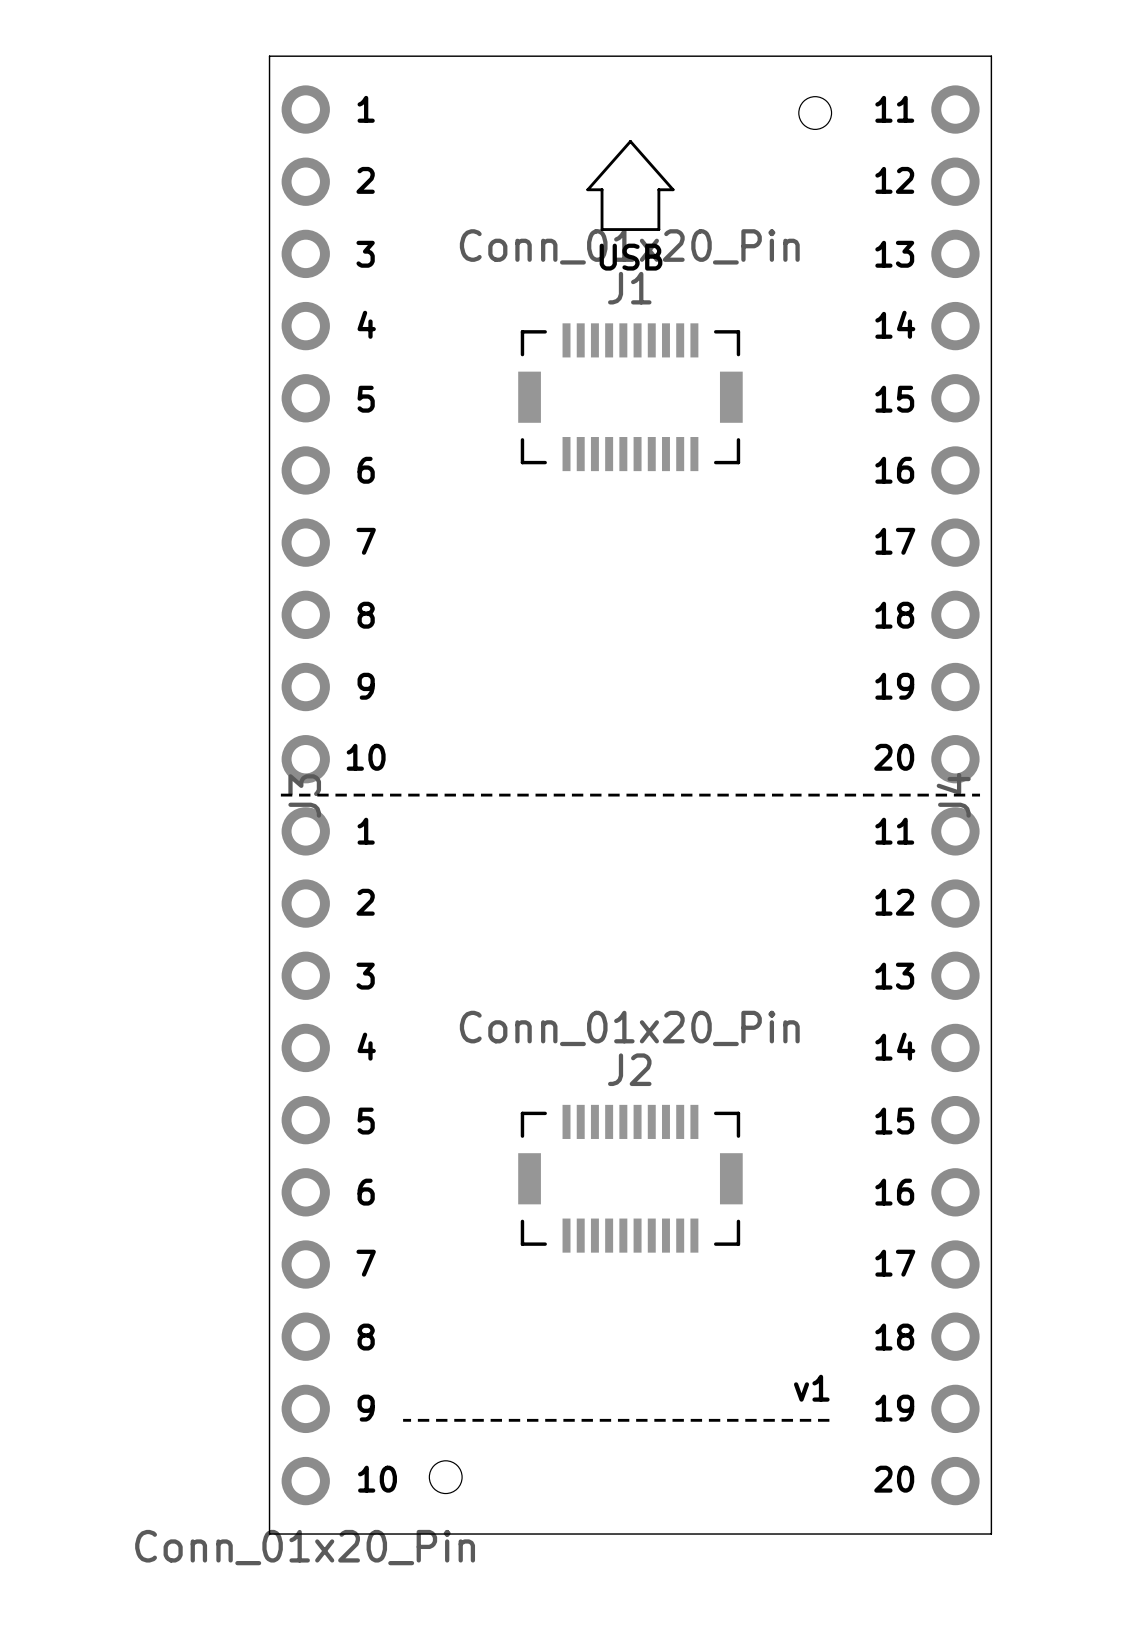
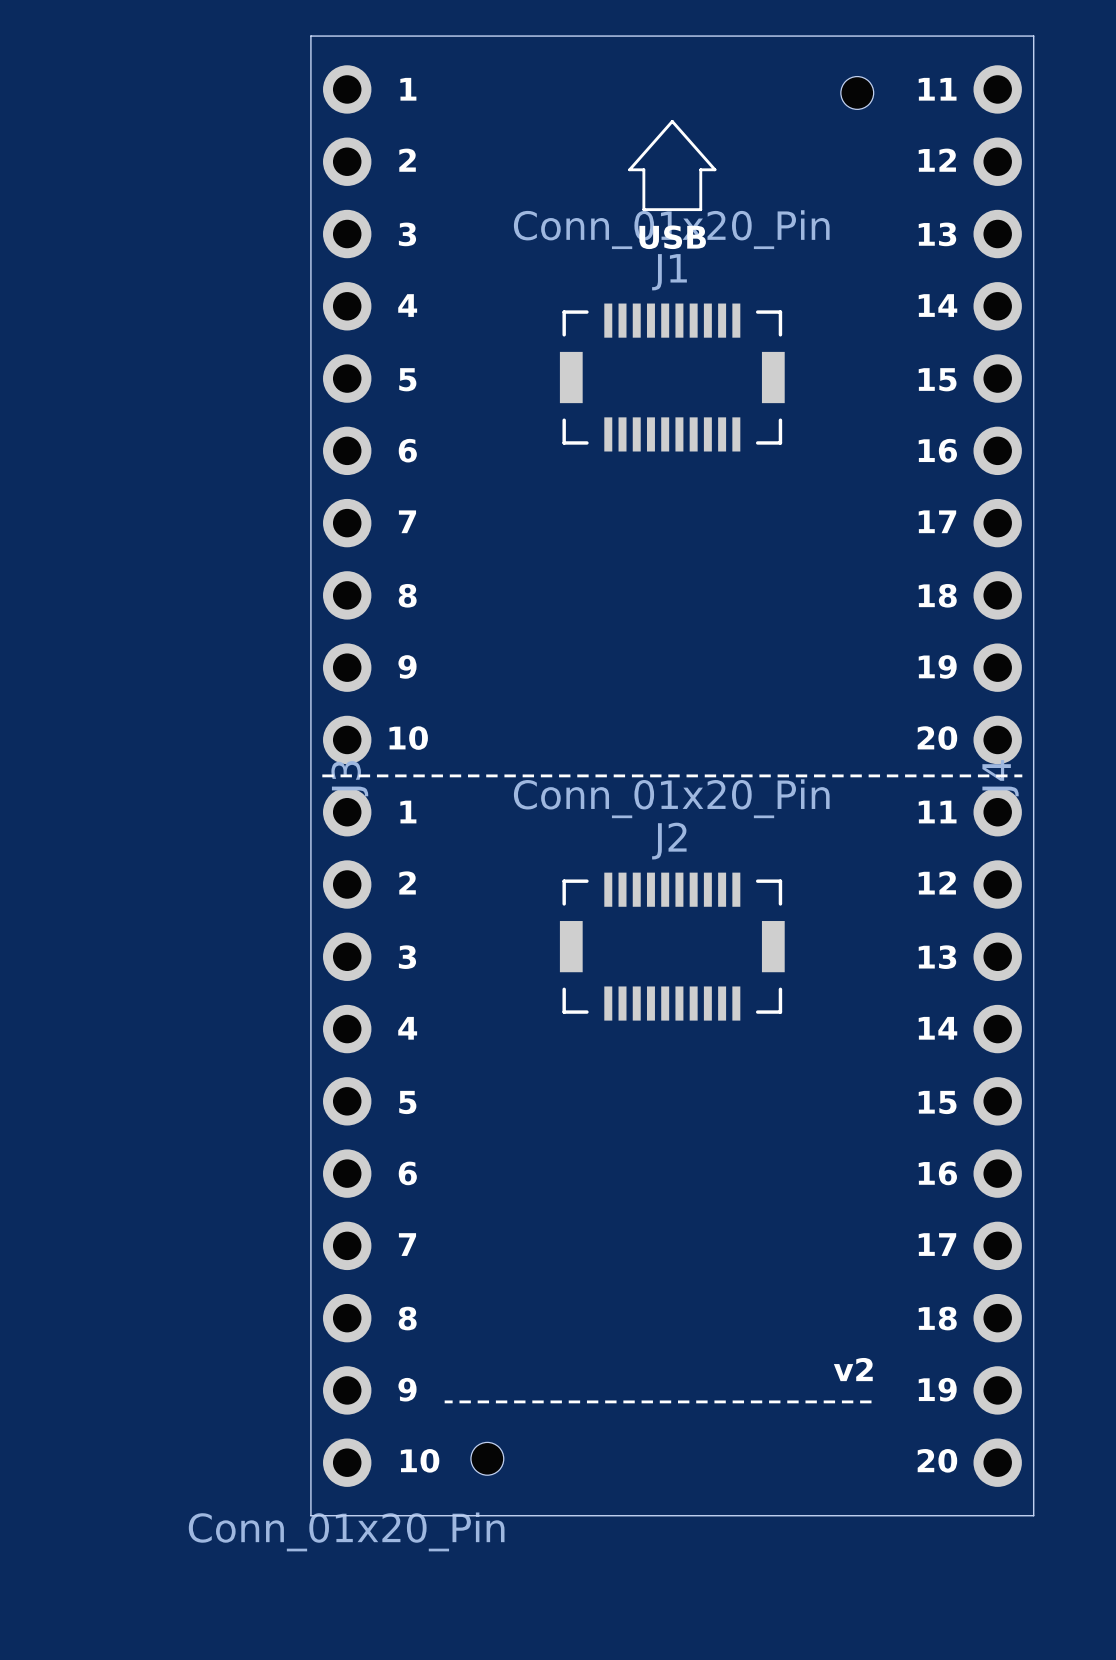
J2 position: (630, 1178) -> (672, 946)
text: v1 (811, 1388) -> v2 (853, 1369)

